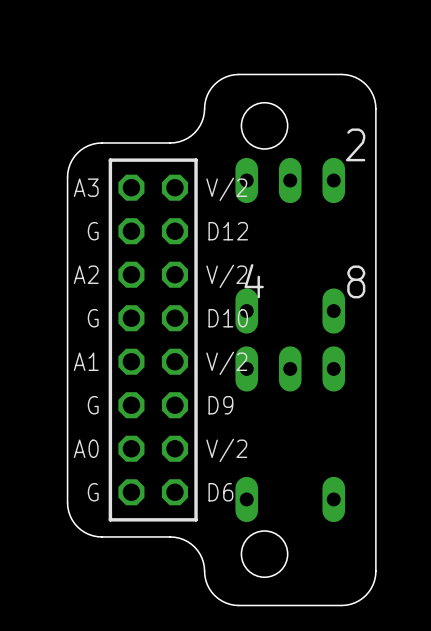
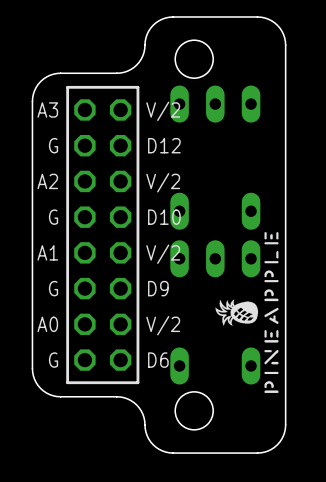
text: 2 (355, 144) -> none
text: 4 (254, 281) -> none
text: 8 (356, 281) -> none
drawing: none -> [215, 232, 279, 393]

